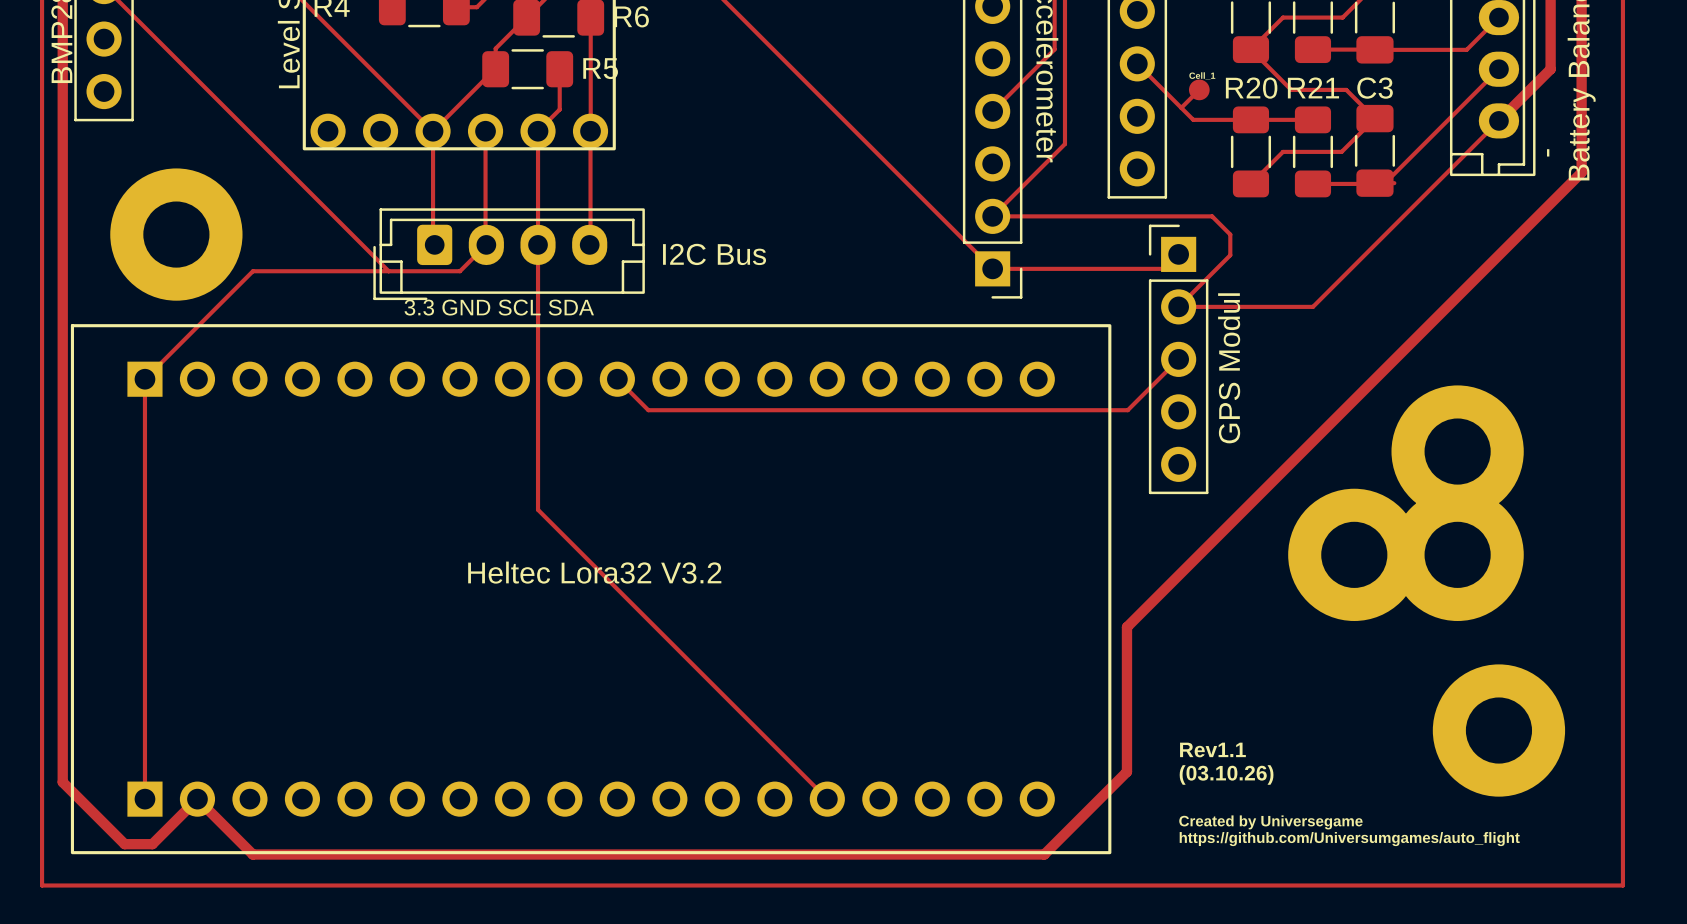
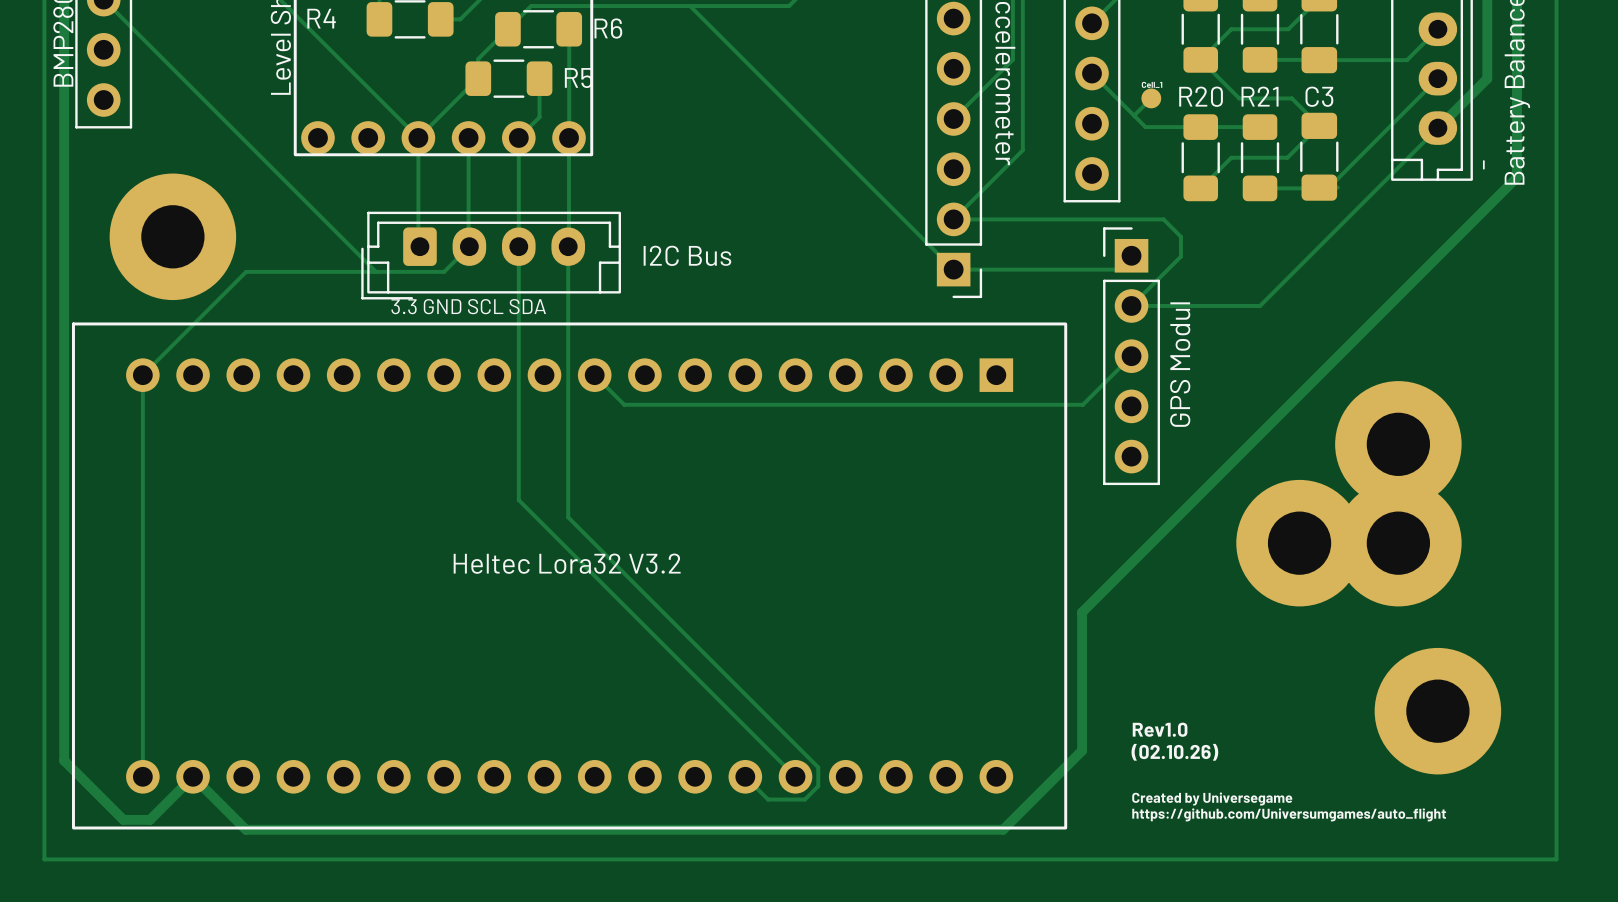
track: none -> (568, 246) (568, 517) (818, 767) (818, 786) (804, 799) (768, 799) (745, 776)
part footprint: [70, 324, 1112, 855] -> [71, 322, 1068, 830]
text: Rev1.1 (1212, 749) -> Rev1.0 (1160, 729)
text: (03.10.26) (1226, 774) -> (02.10.26) (1174, 752)

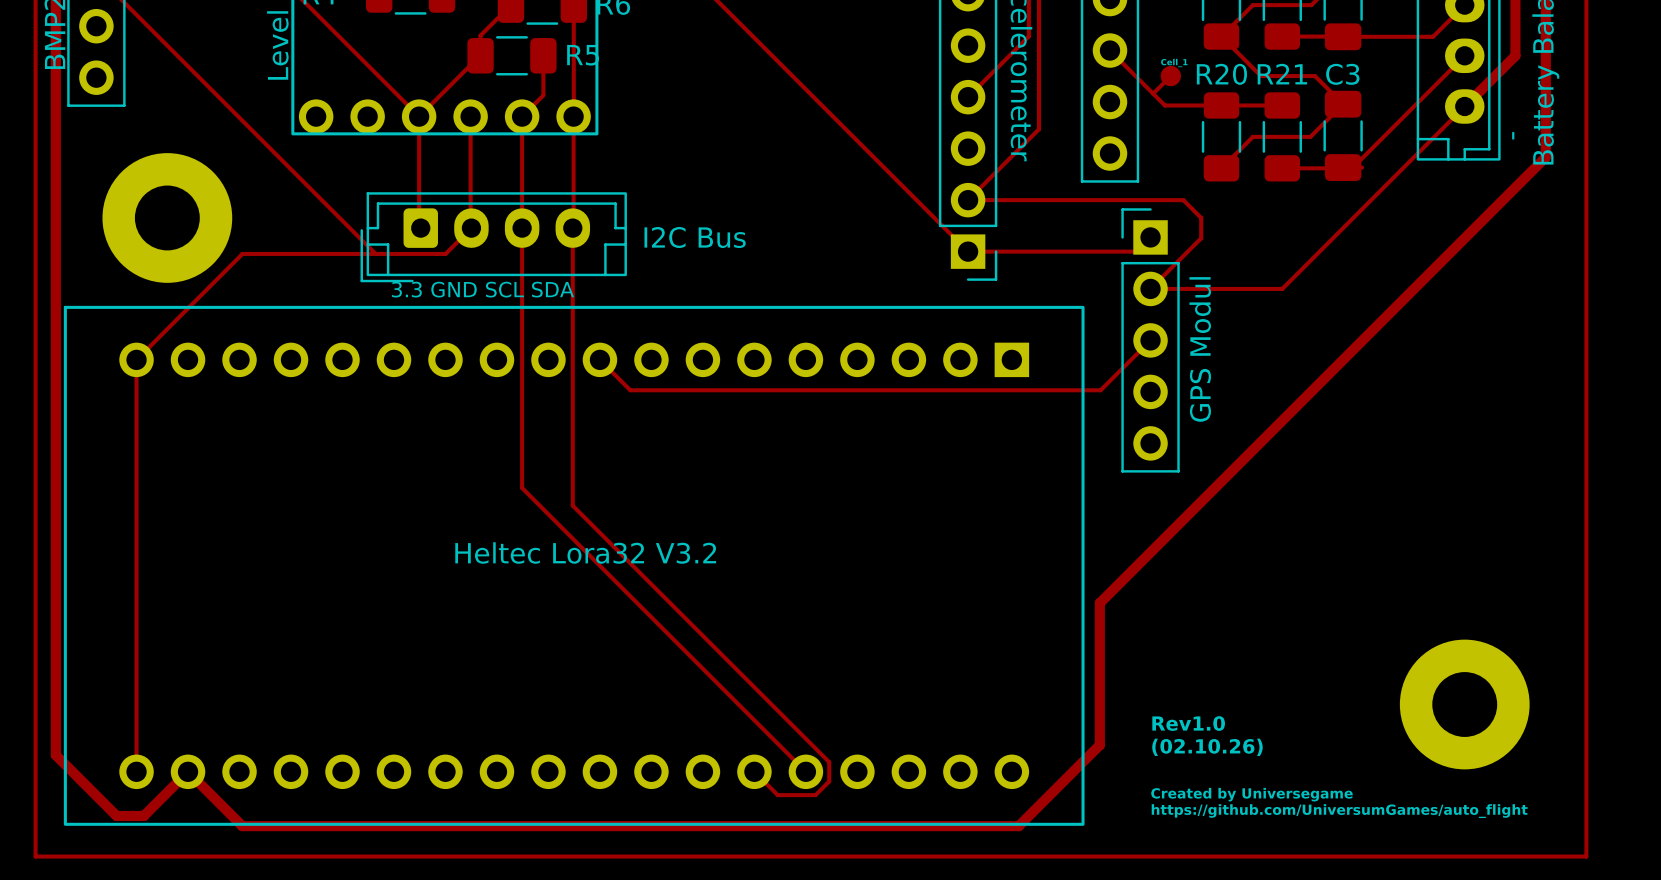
part: (1398, 444) -> none
part: (1299, 543) -> none
part: (1398, 543) -> none
text: https://github.com/Universumgames/auto_flight (1289, 814) -> https://github.com/UniversumGames/auto_flight (1339, 811)

